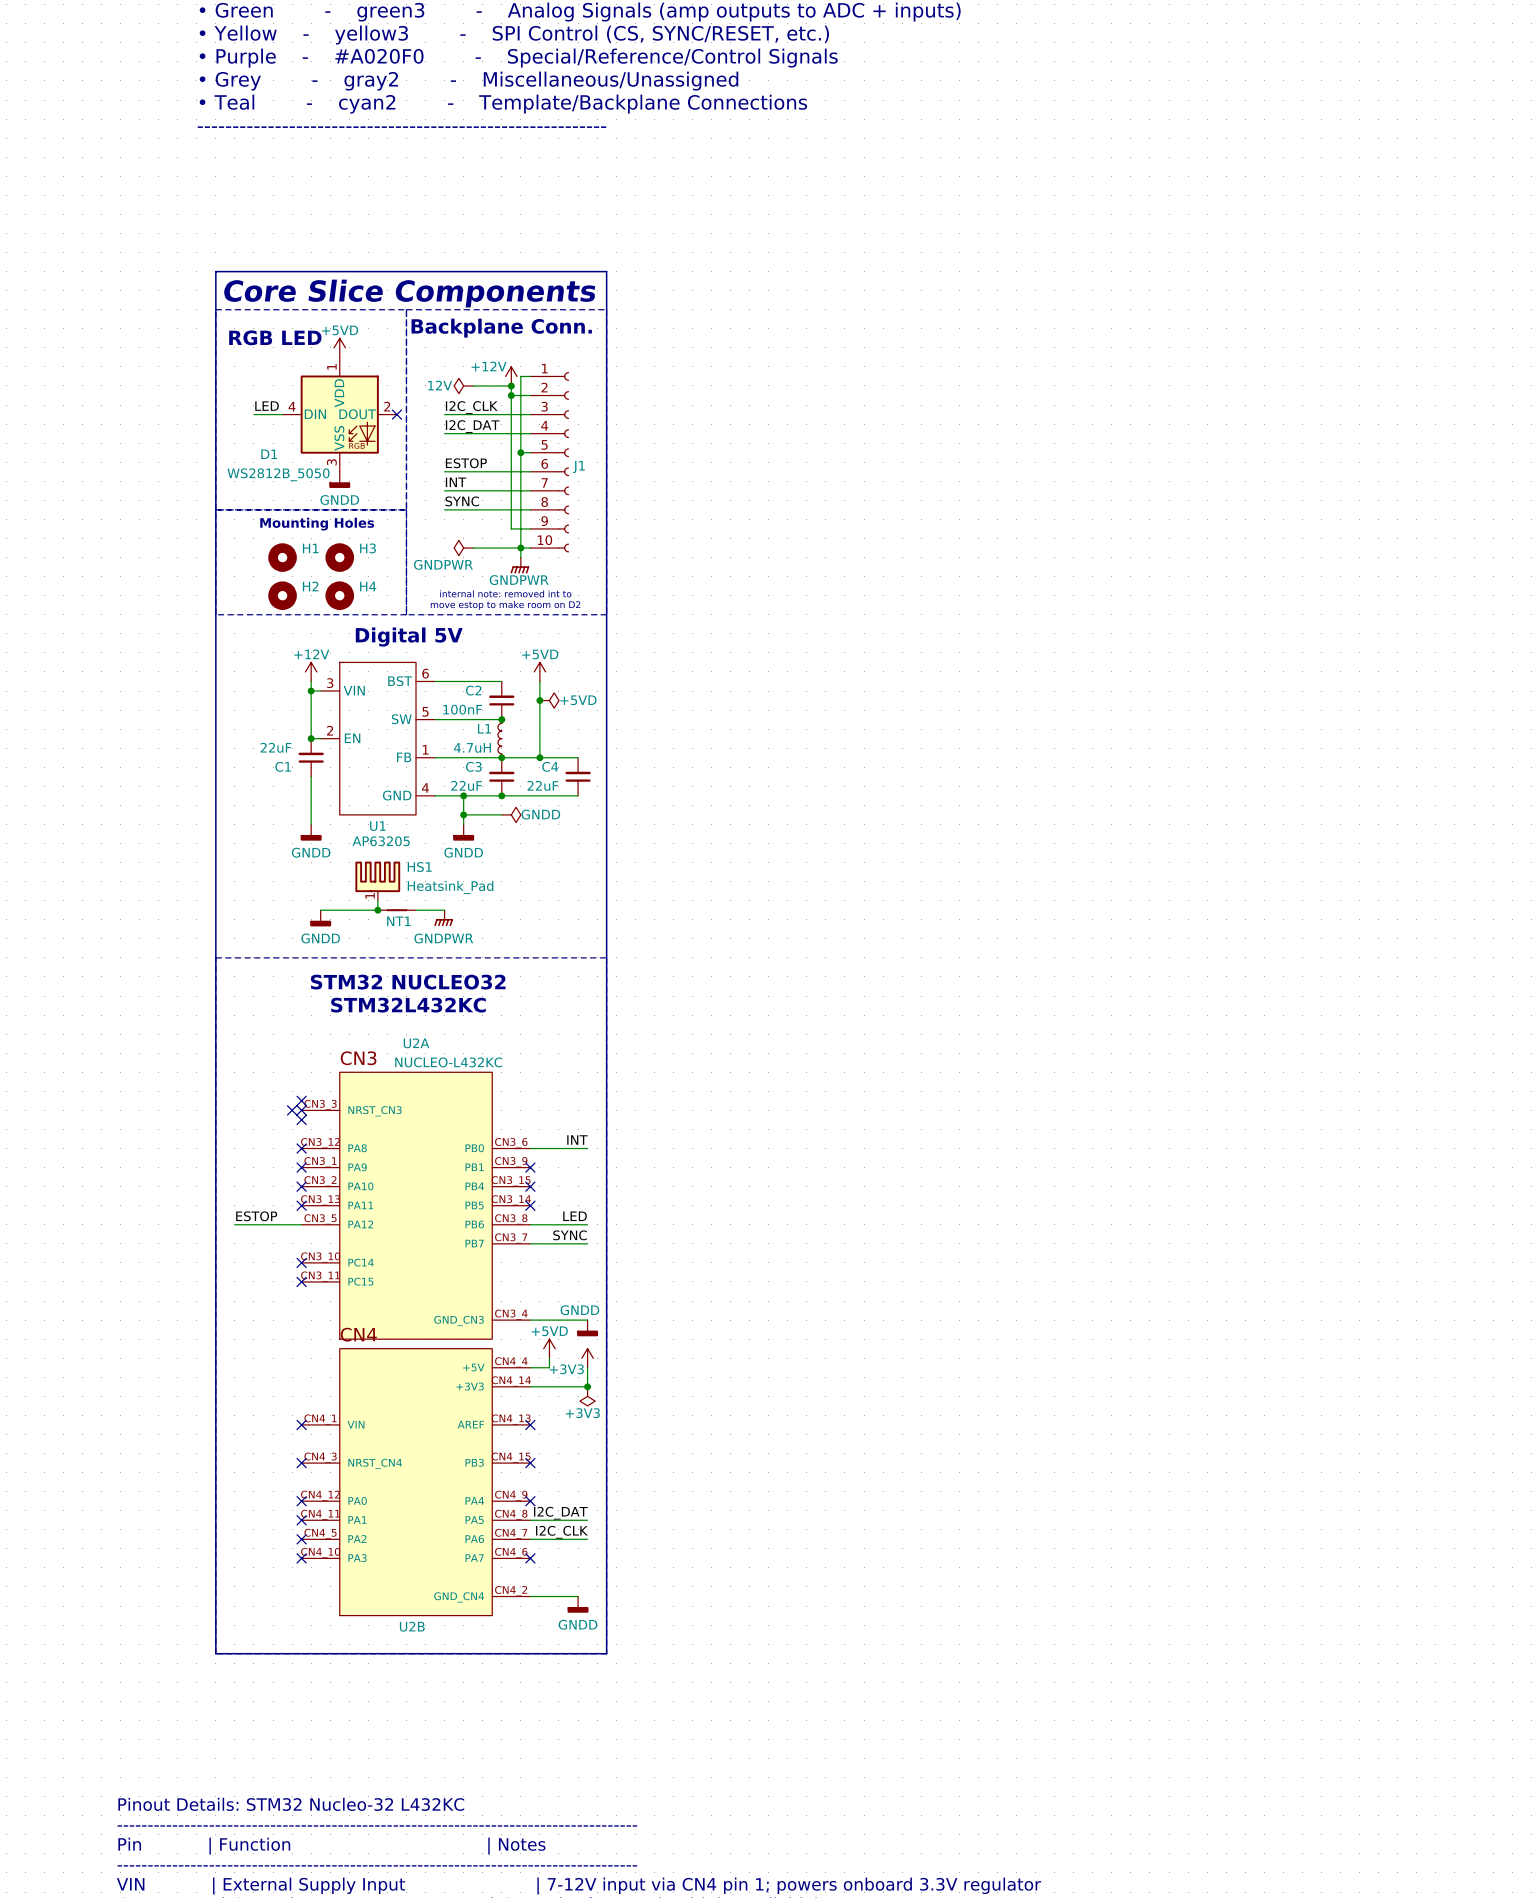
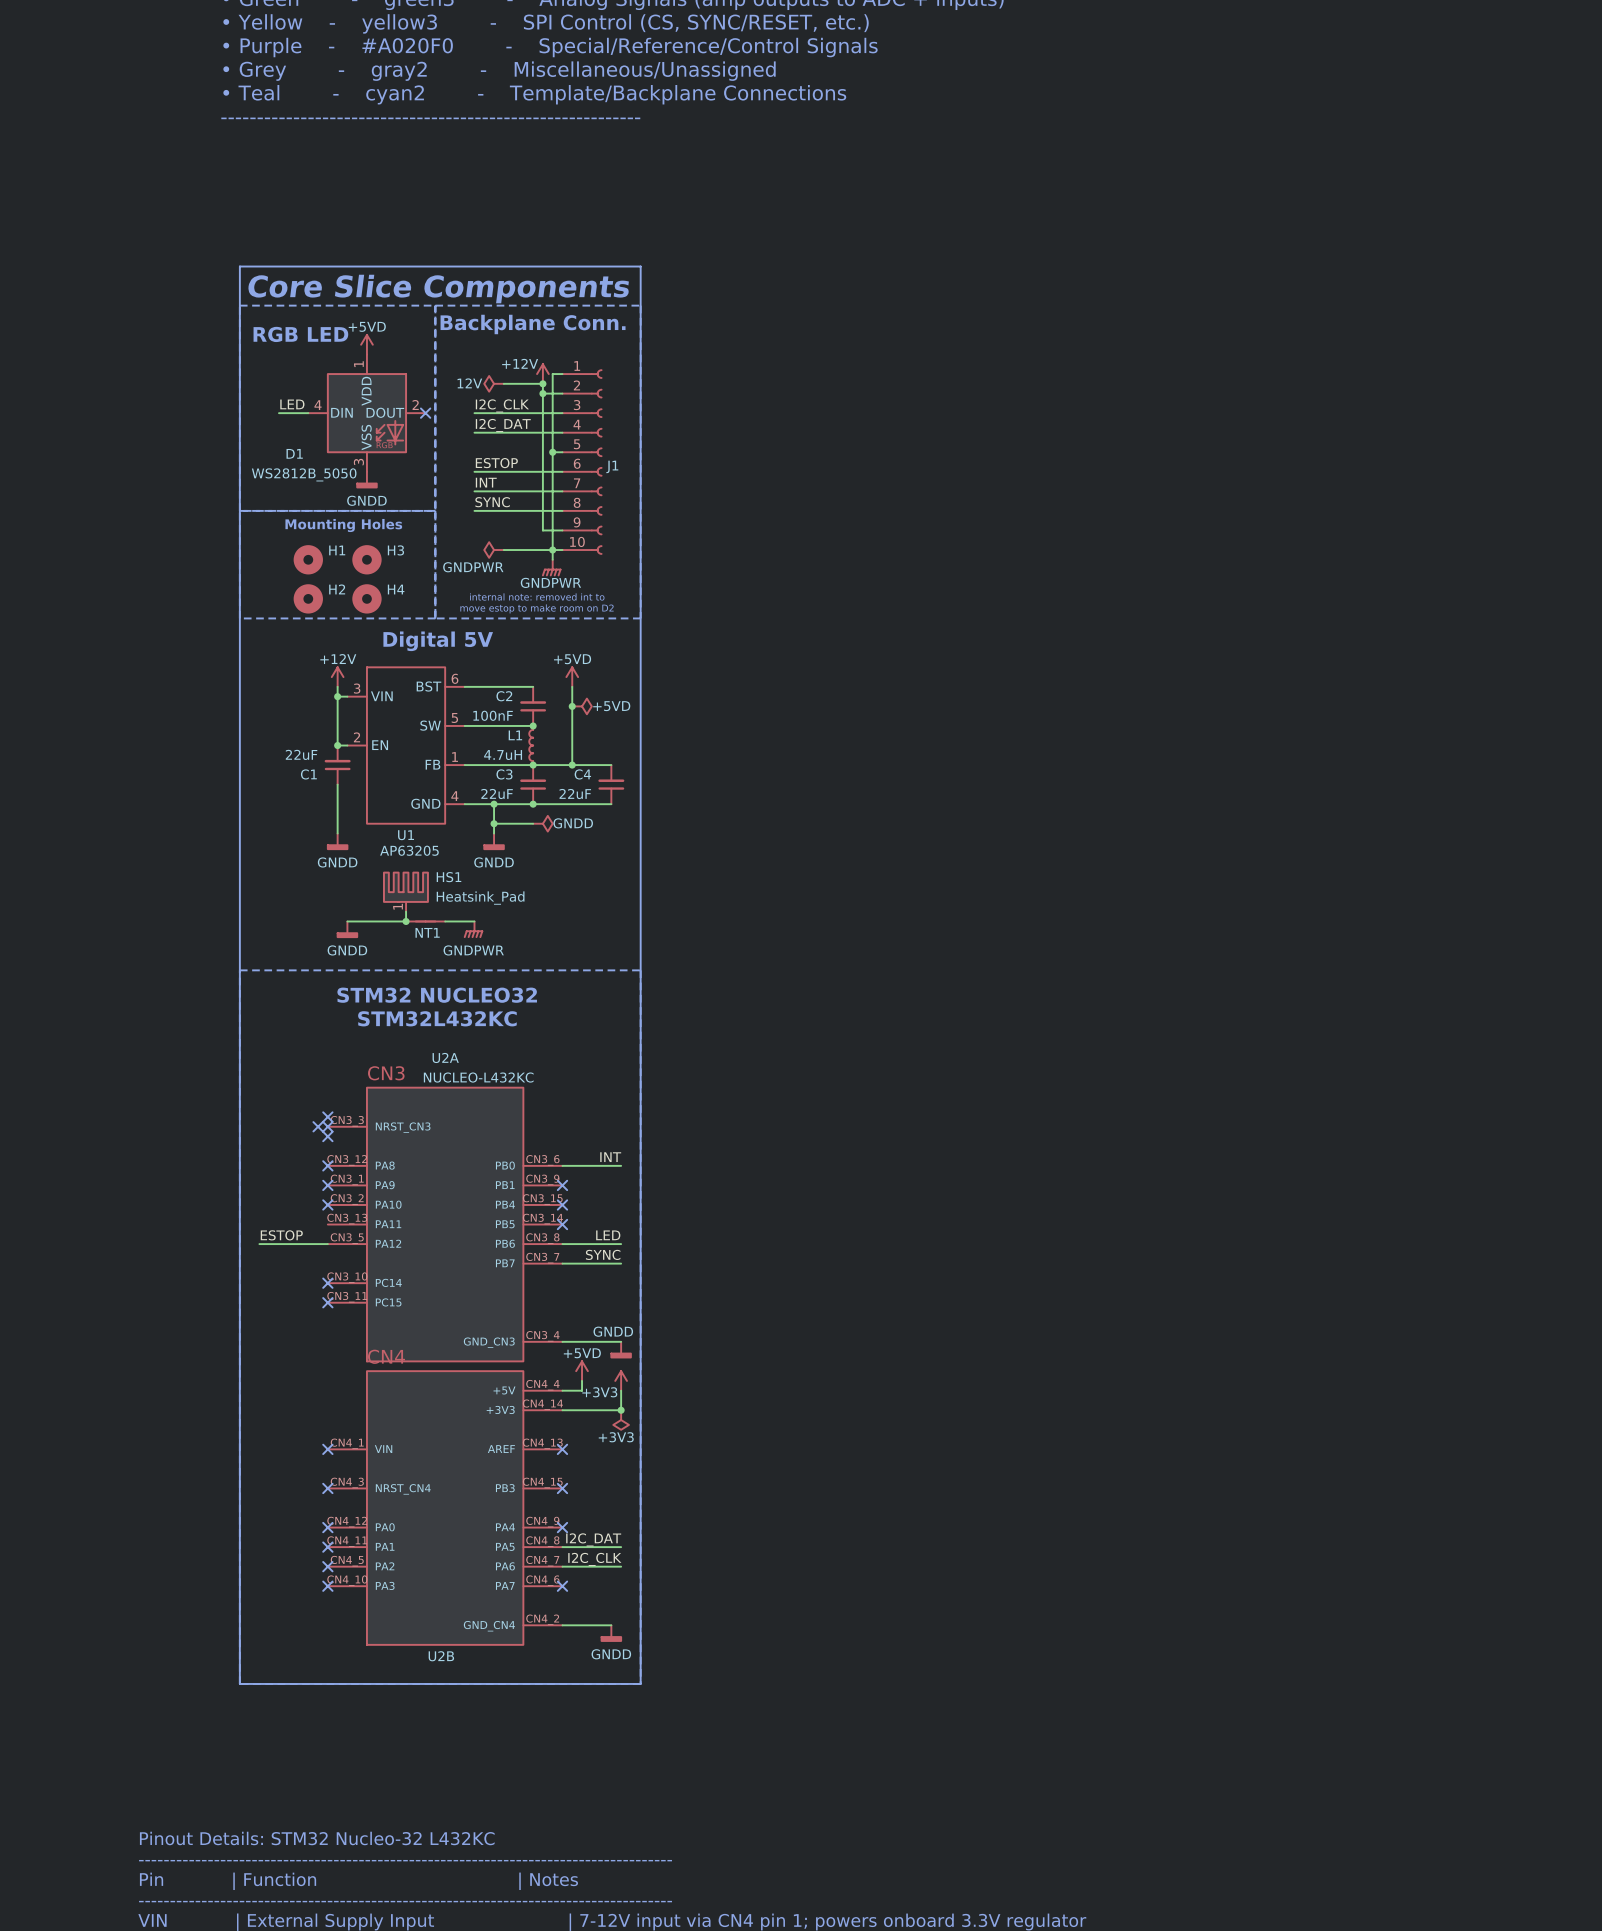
no-connect mark: (301, 1205) -> none

